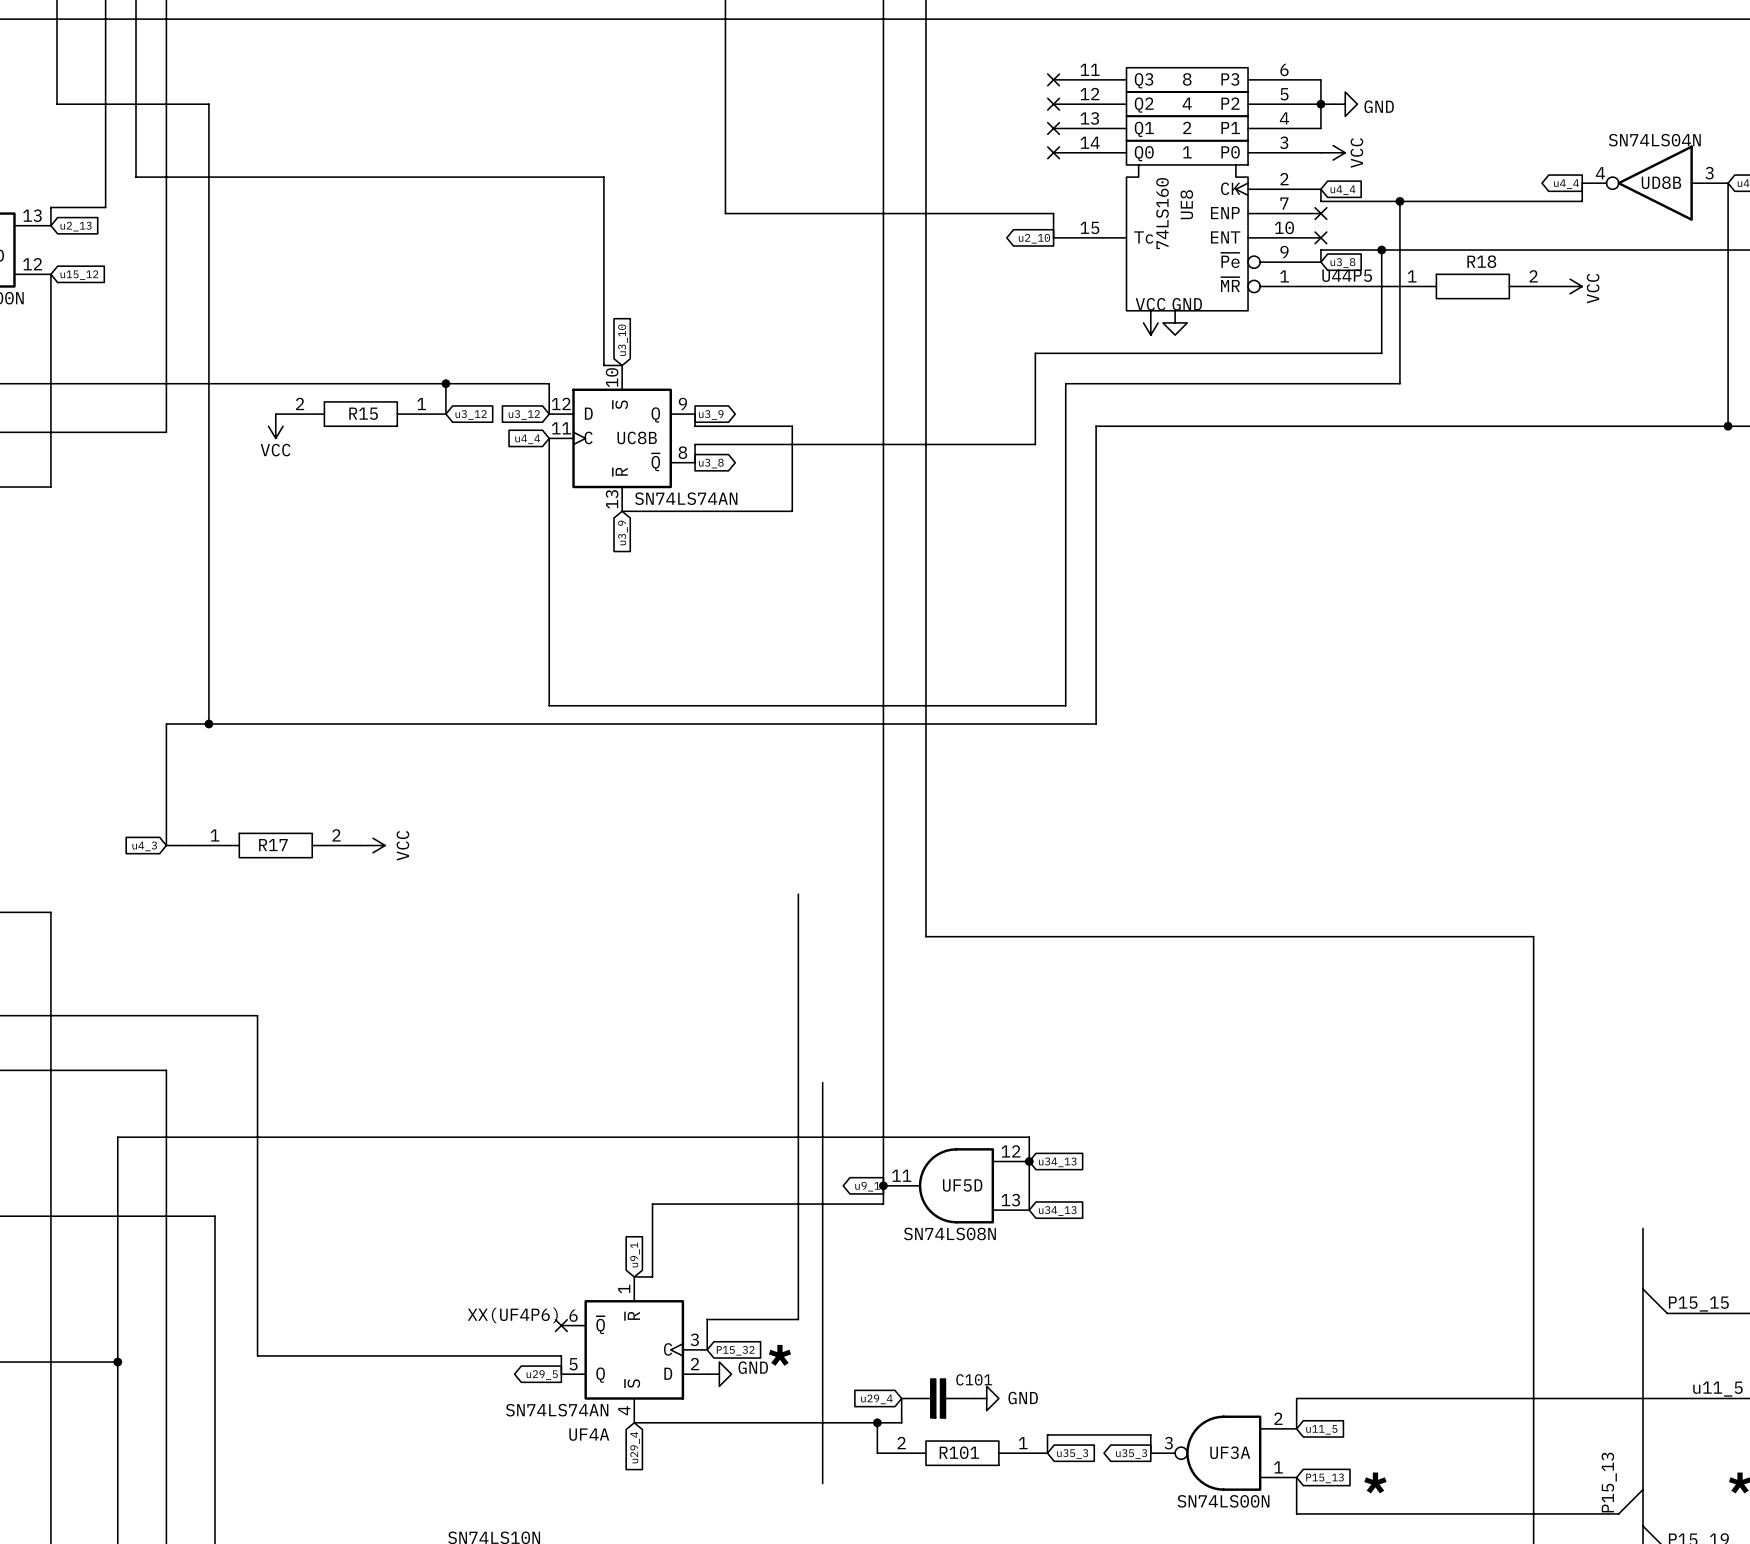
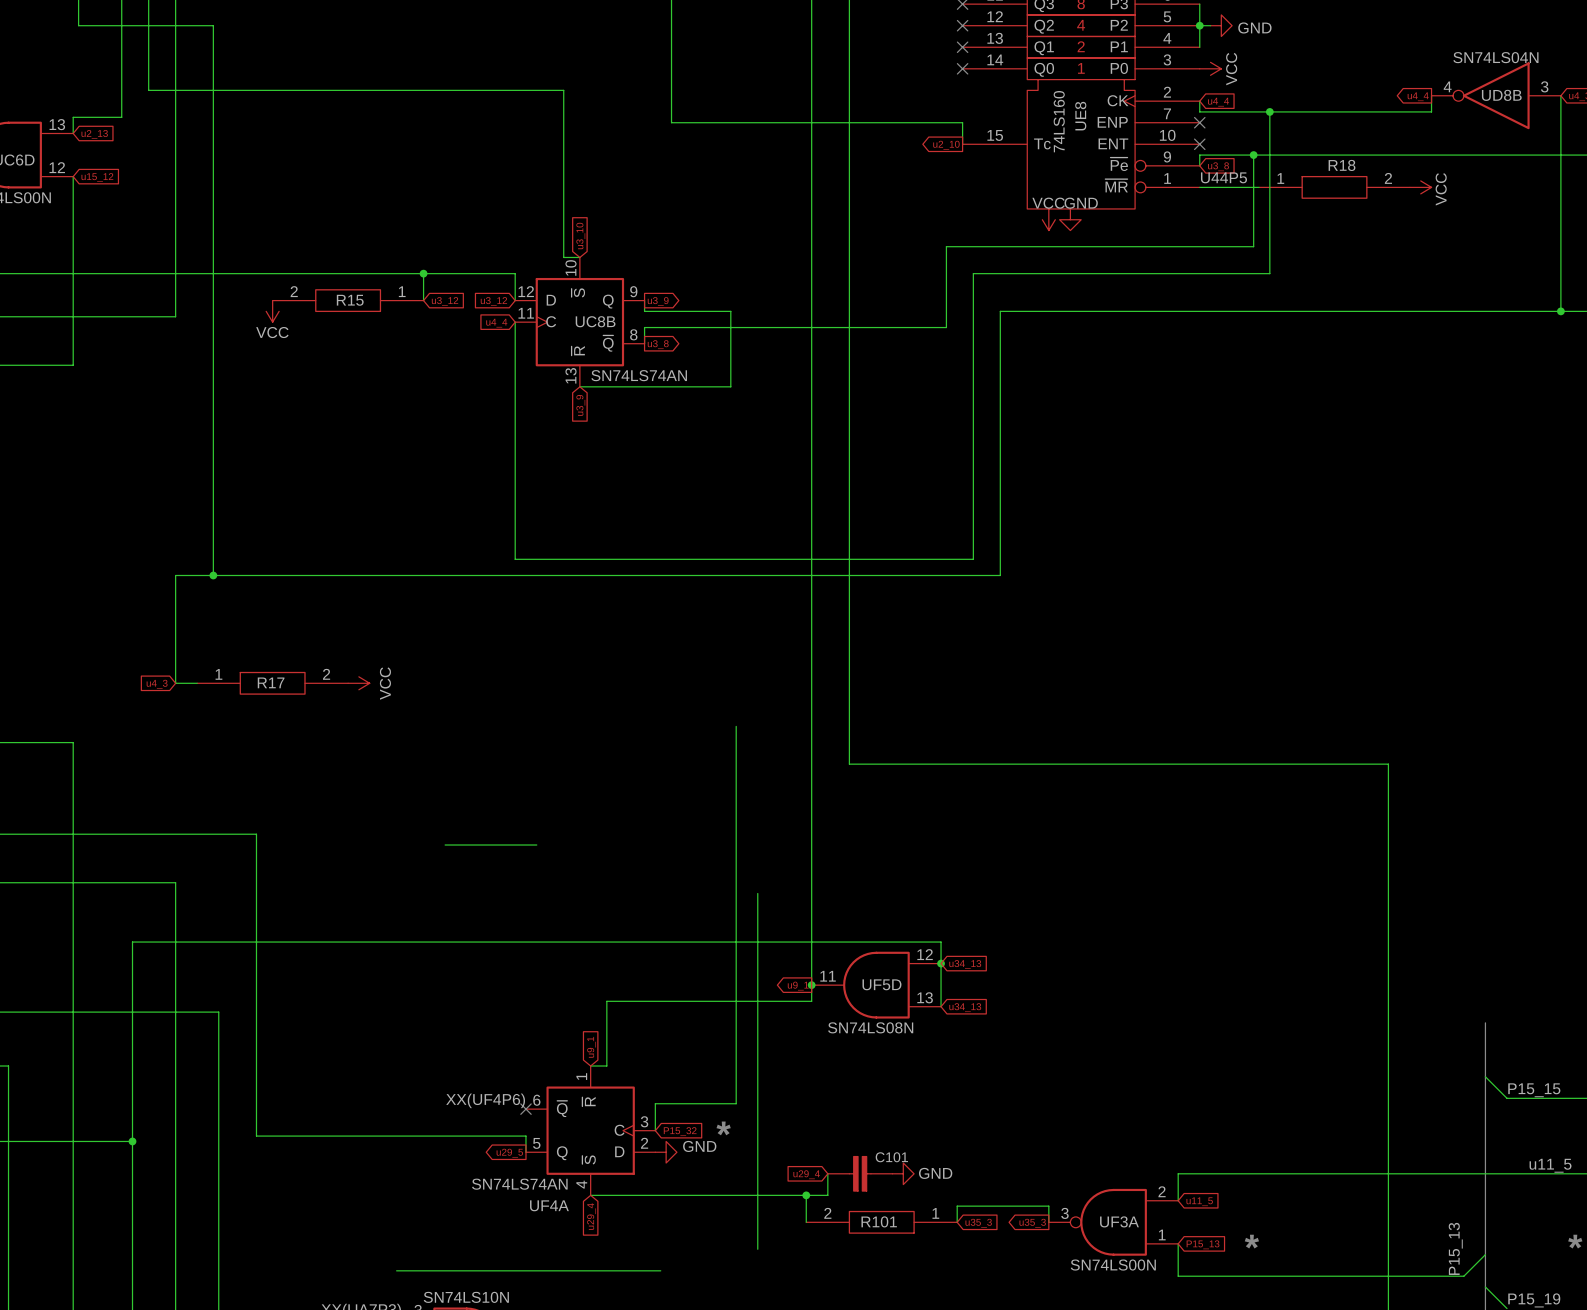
wire: none -> (445, 845) (536, 845)
wire: none -> (396, 1270) (660, 1270)

